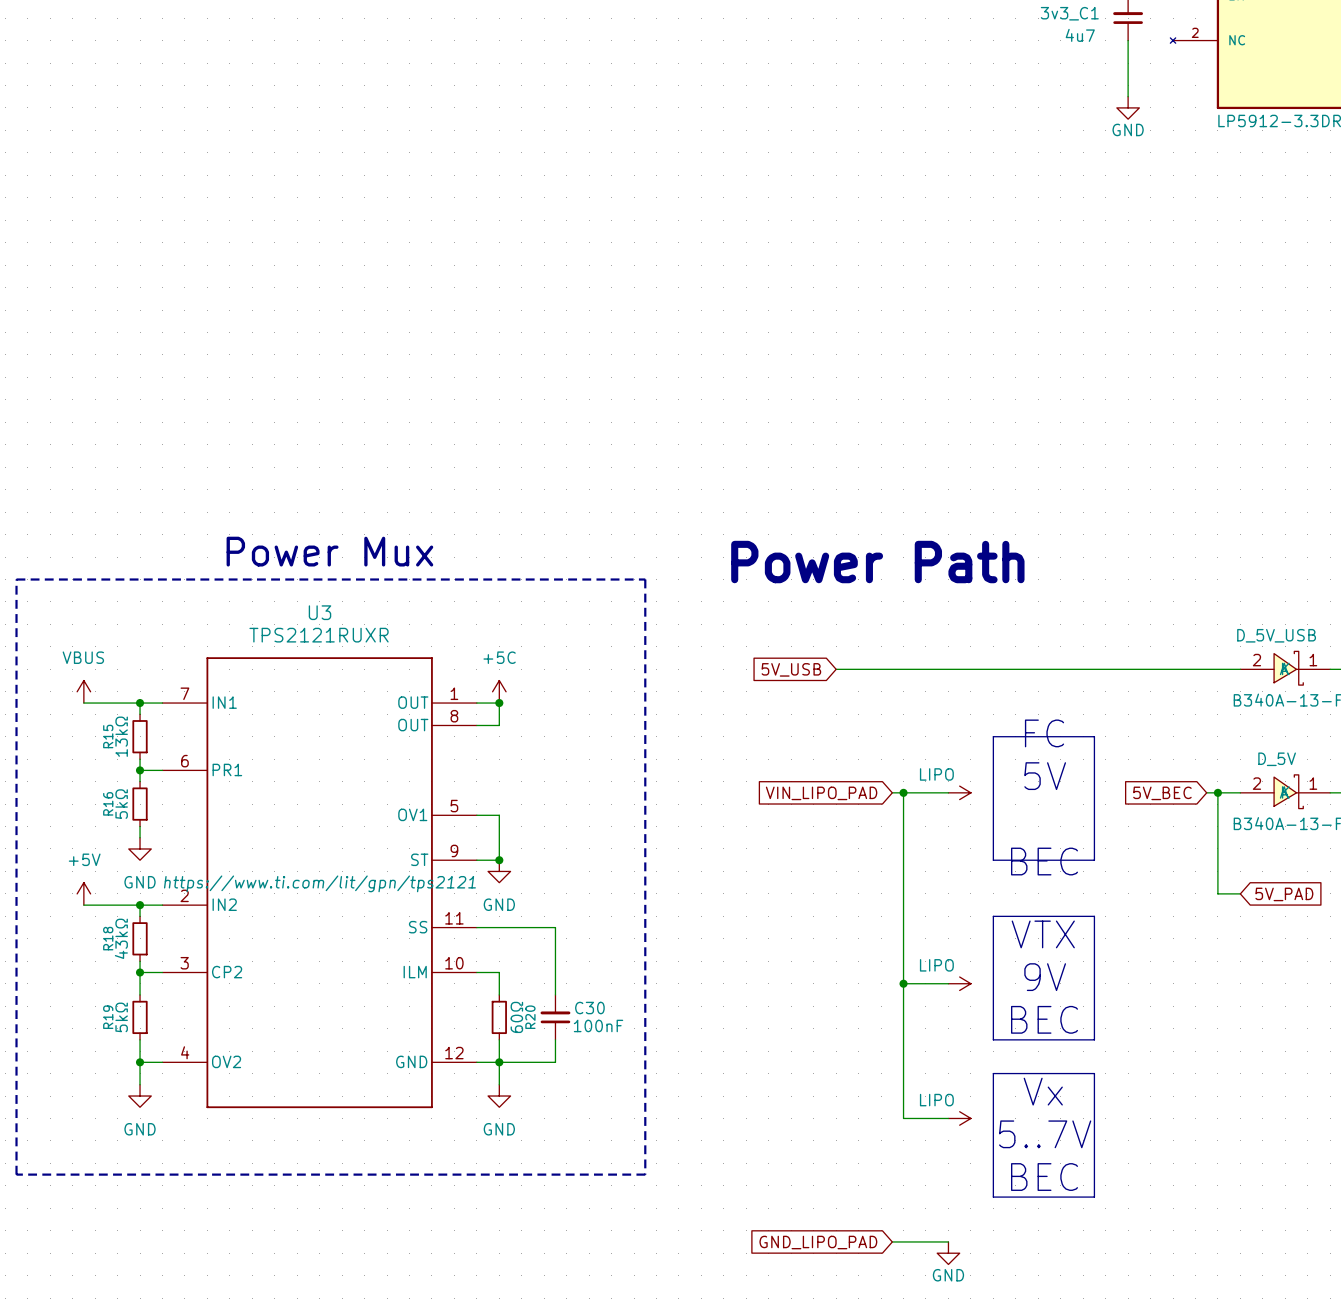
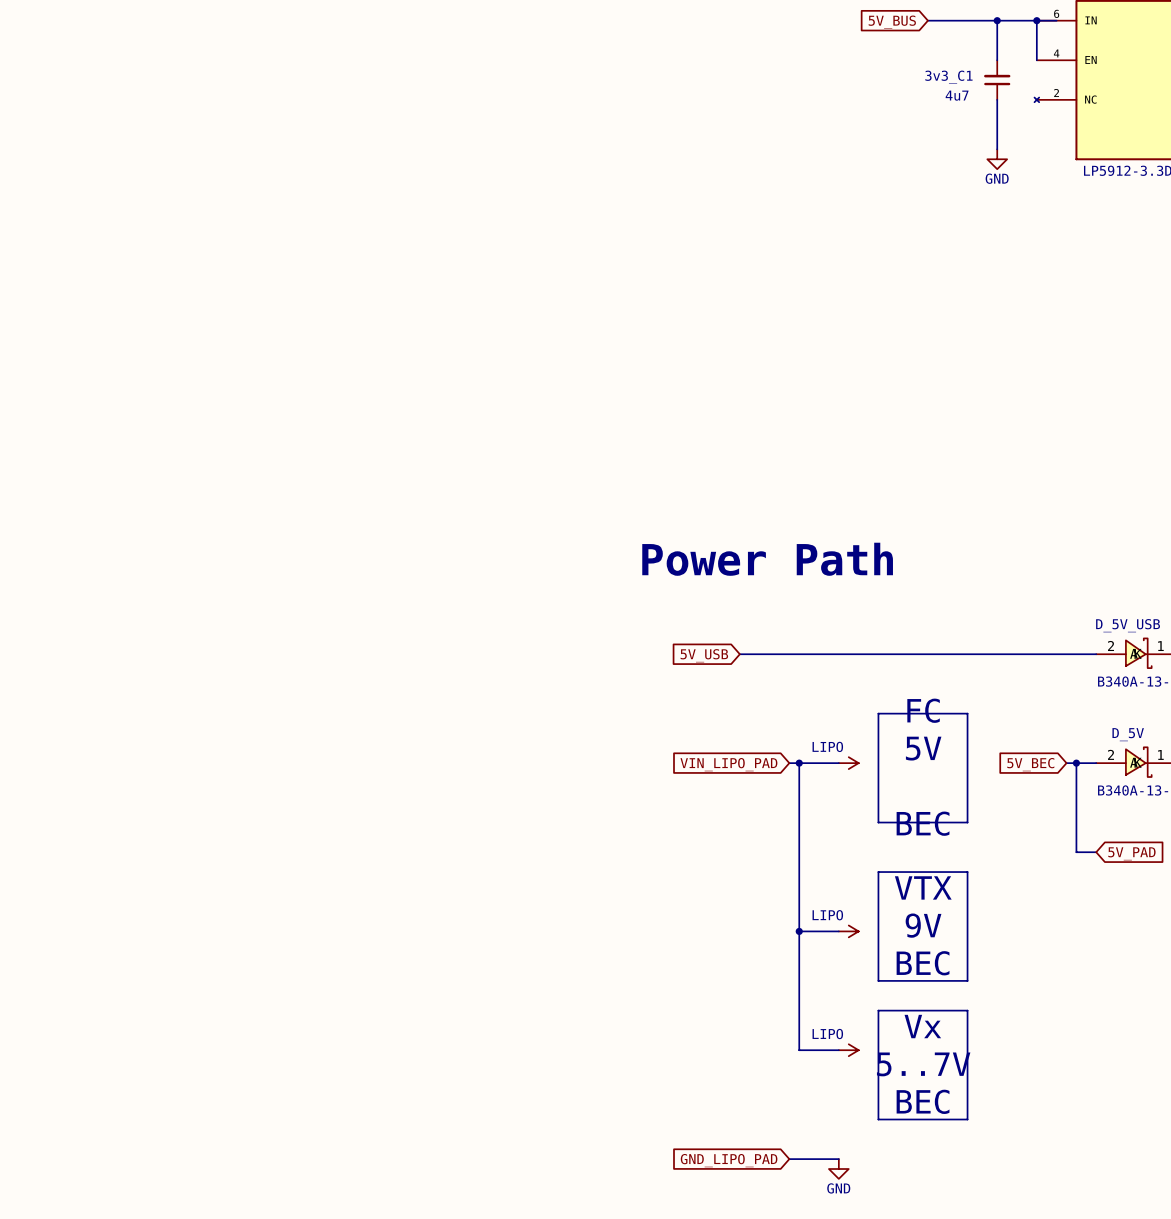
text: Power Mux (329, 551) -> none
line: (16, 579) (645, 579) (645, 1174) (16, 1174) (16, 579) -> none
power symbol: VBUS (83, 691) -> none
power symbol: +5C (499, 691) -> none
wire: (83, 703) (162, 703) -> none
wire: (140, 703) (140, 714) -> none
junction: (140, 703) -> none
wire: (476, 703) (499, 703) (499, 725) (476, 725) -> none
junction: (499, 703) -> none
R15: 13kΩ (140, 736) -> none
wire: (140, 759) (140, 781) -> none
wire: (140, 770) (162, 770) -> none
junction: (140, 770) -> none
R16: 5kΩ (140, 804) -> none
wire: (476, 815) (499, 815) (499, 860) (476, 860) -> none
wire: (140, 826) (140, 837) -> none
power symbol: GND (140, 848) -> none
junction: (499, 860) -> none
power symbol: GND (499, 871) -> none
U3: TPS2121RUXR (319, 882) -> none
power symbol: +5V (83, 893) -> none
wire: (83, 905) (162, 905) -> none
wire: (140, 905) (140, 916) -> none
junction: (140, 905) -> none
wire: (476, 927) (555, 927) (555, 994) -> none
R18: 43kΩ (140, 938) -> none
wire: (140, 961) (140, 994) -> none
wire: (140, 972) (162, 972) -> none
junction: (140, 972) -> none
wire: (476, 972) (499, 972) (499, 994) -> none
R19: 5kΩ (140, 1017) -> none
R20: 60Ω (499, 1017) -> none
C30: 100nF (555, 1017) -> none
wire: (140, 1039) (140, 1084) -> none
wire: (499, 1039) (499, 1084) -> none
wire: (555, 1039) (555, 1062) (476, 1062) -> none
wire: (140, 1062) (162, 1062) -> none
junction: (140, 1062) -> none
junction: (499, 1062) -> none
power symbol: GND (140, 1096) -> none
power symbol: GND (499, 1096) -> none

